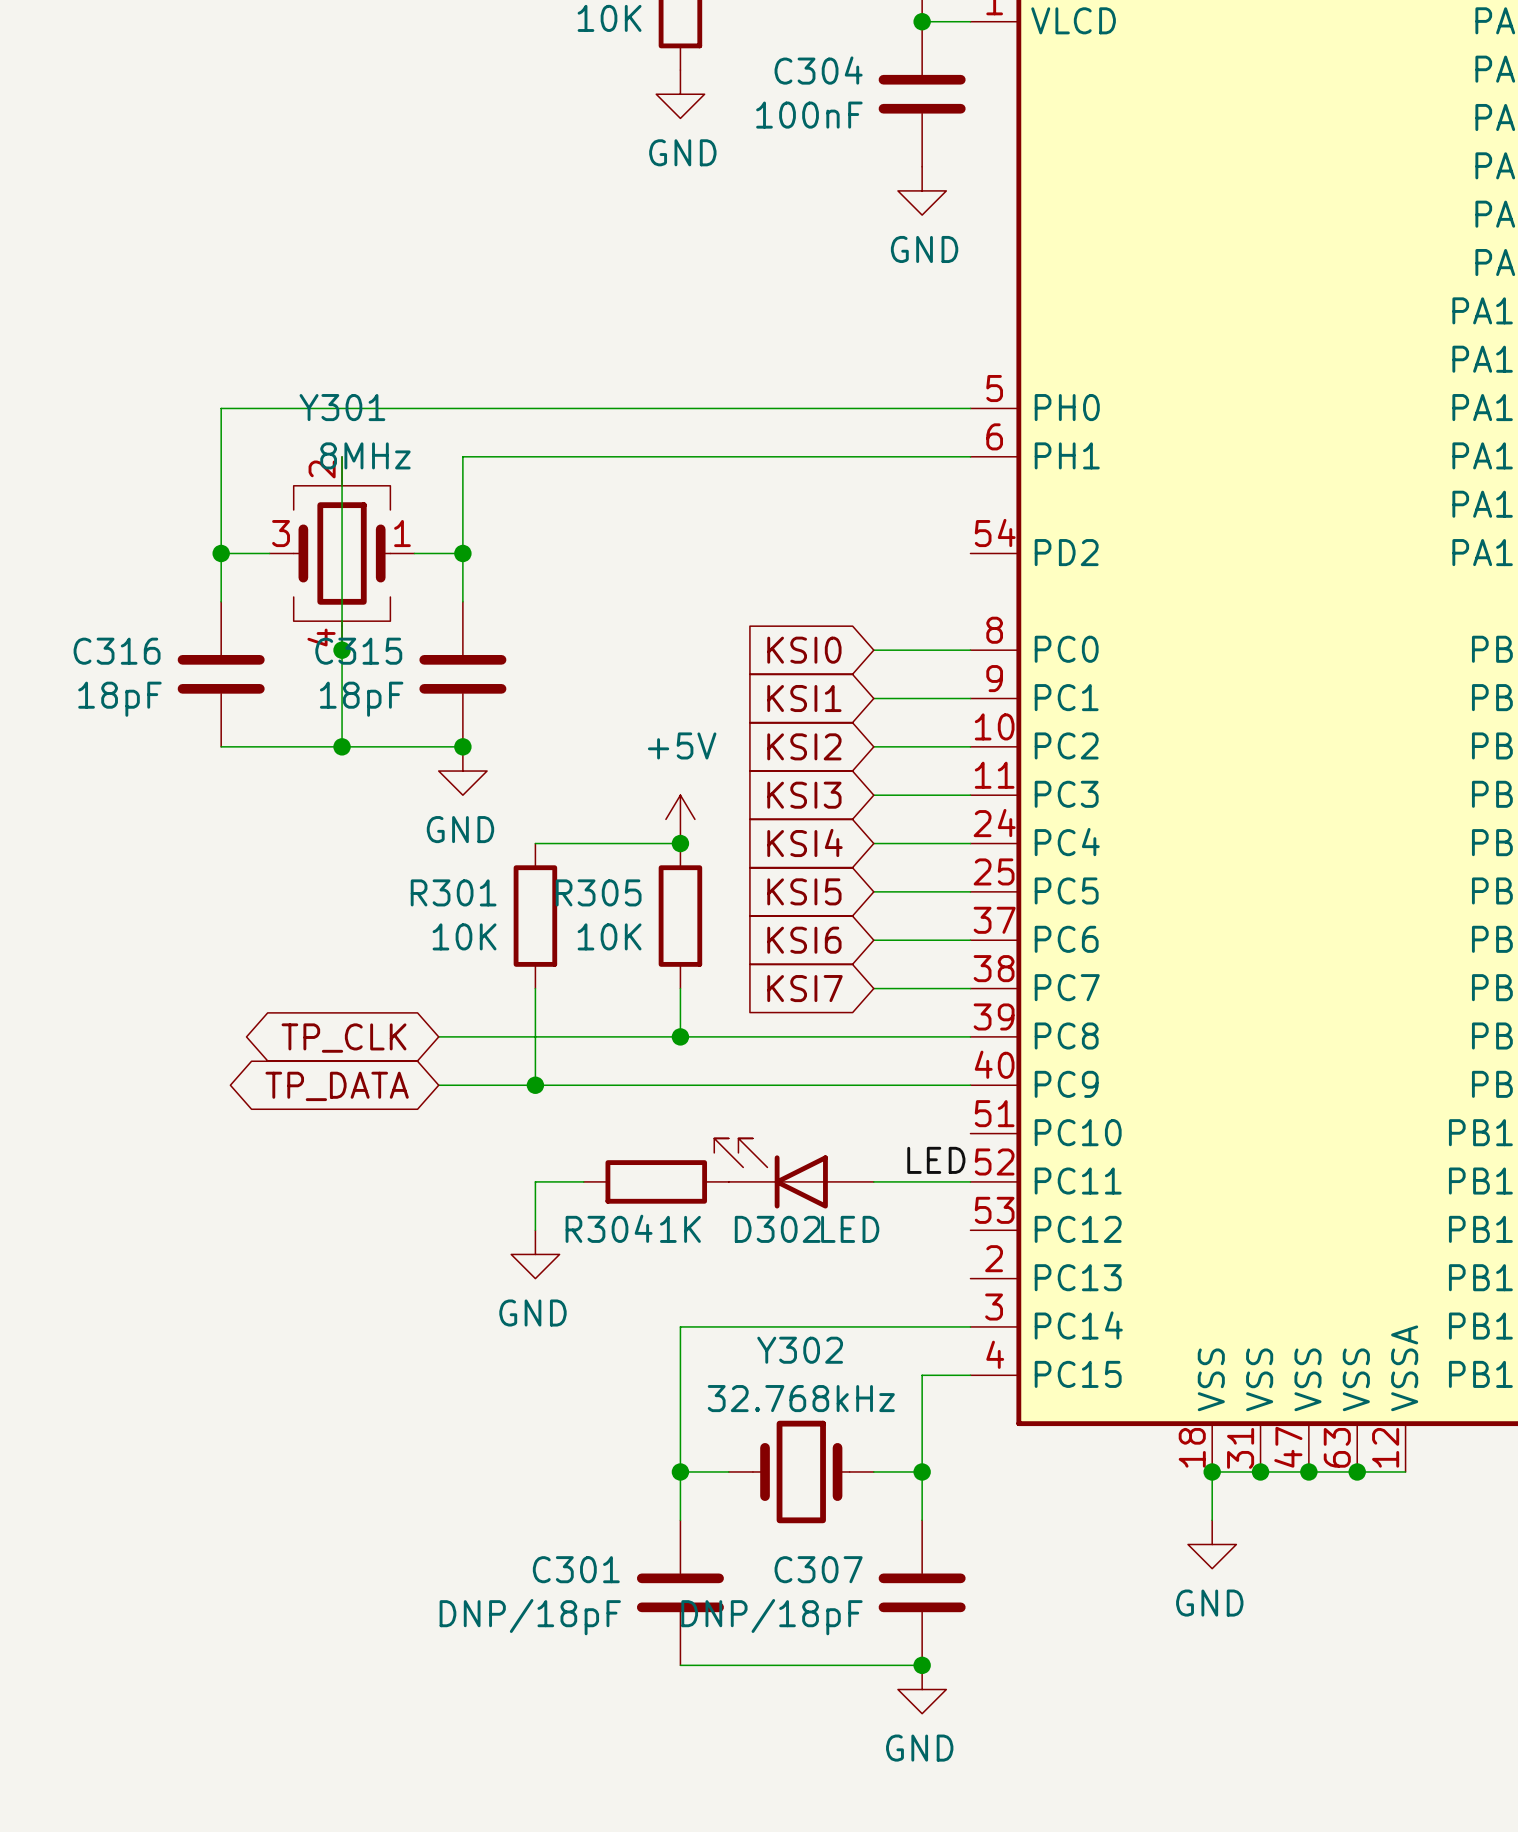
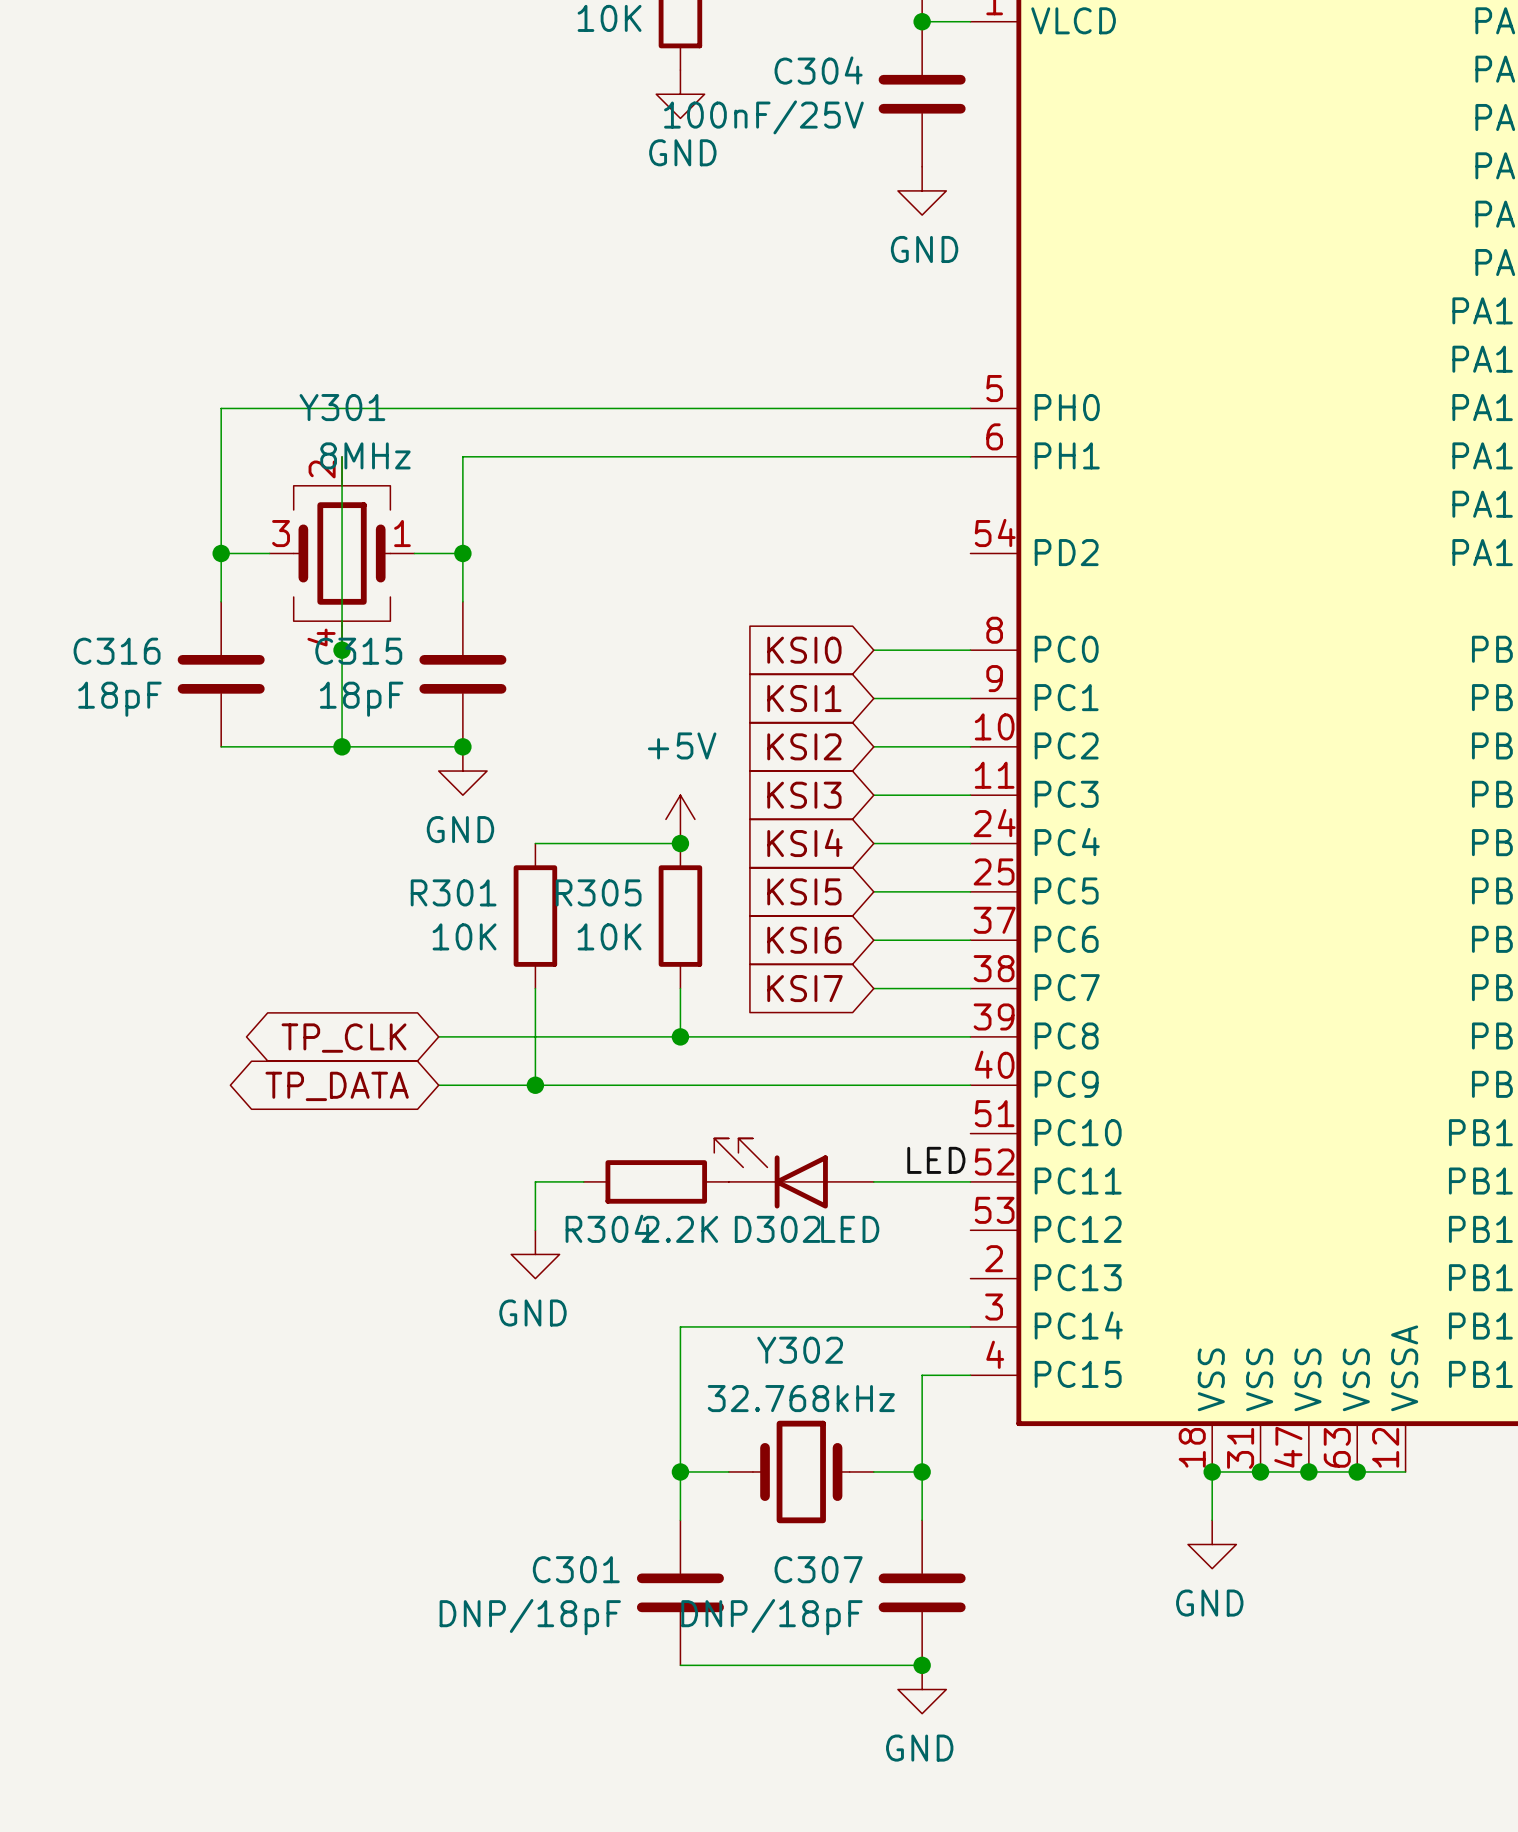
C304 value: 100nF (809, 115) -> 100nF/25V (763, 117)
R304 value: 1K (680, 1229) -> 2.2K (679, 1229)

